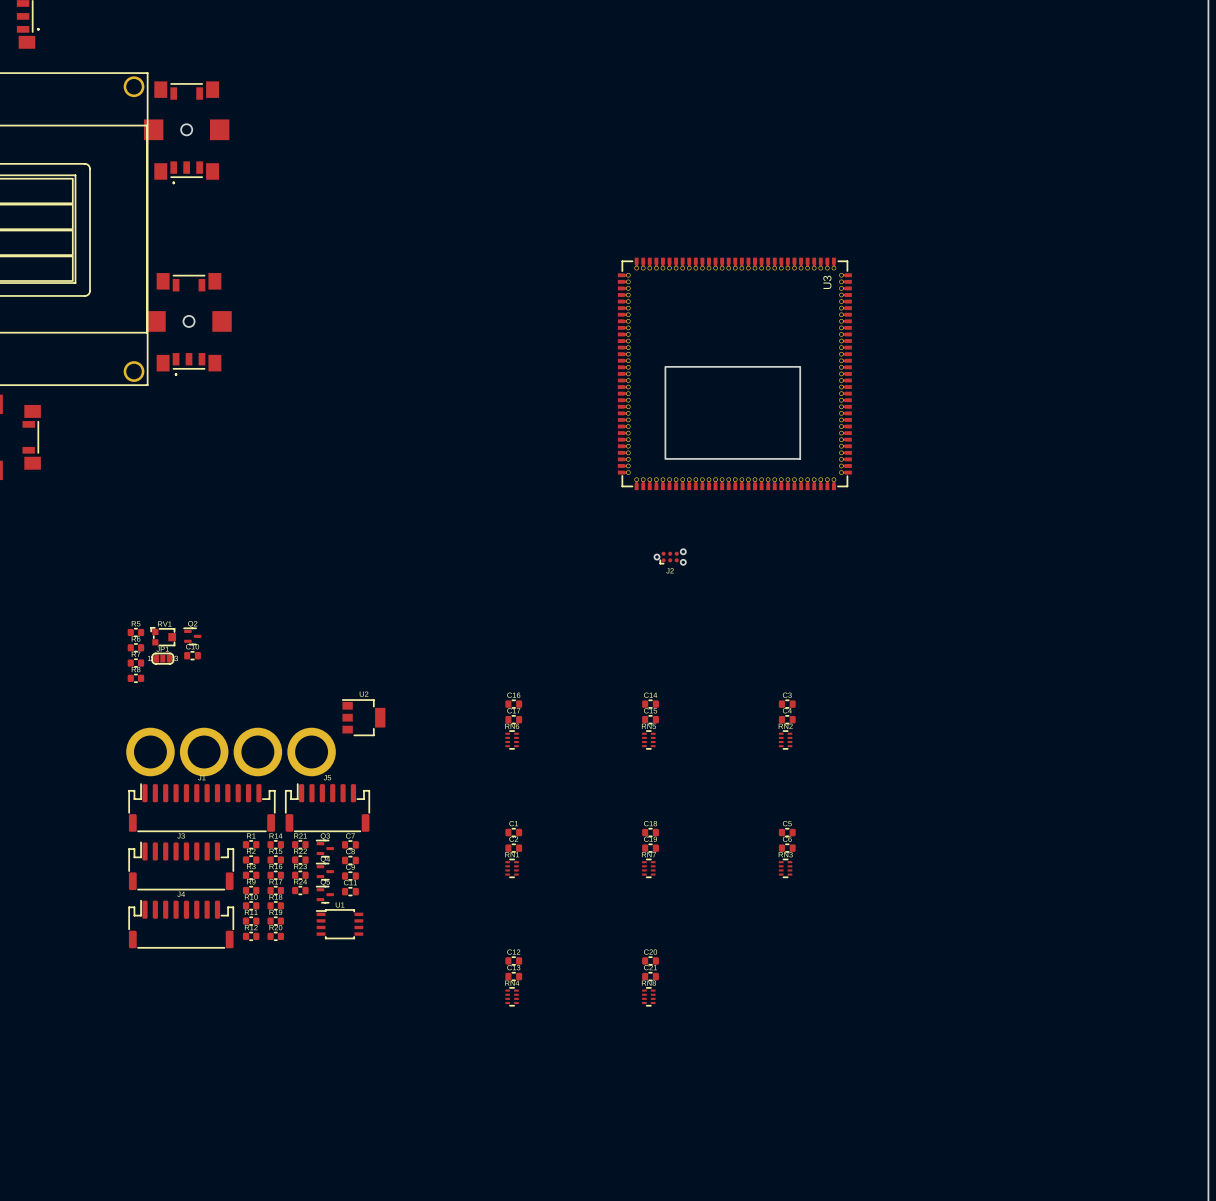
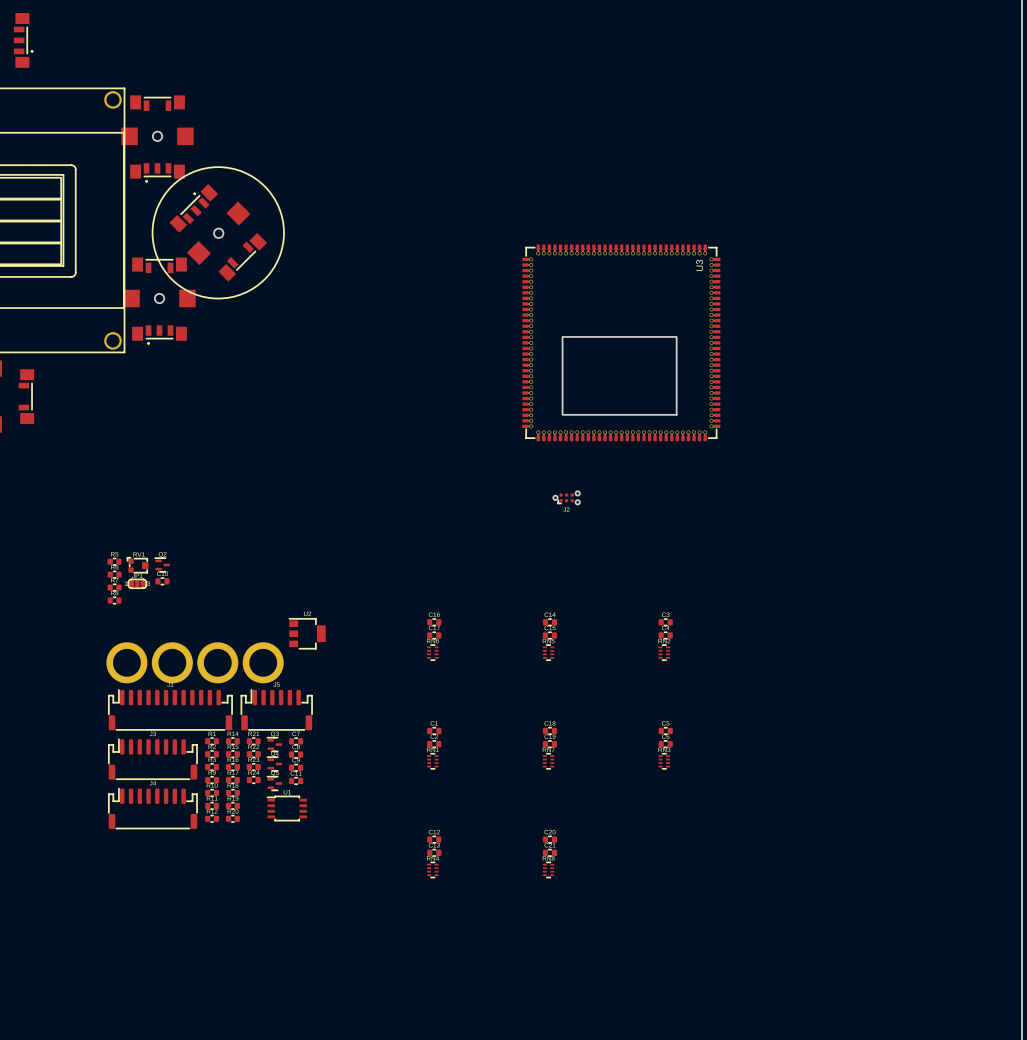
part: none -> (218, 232)

